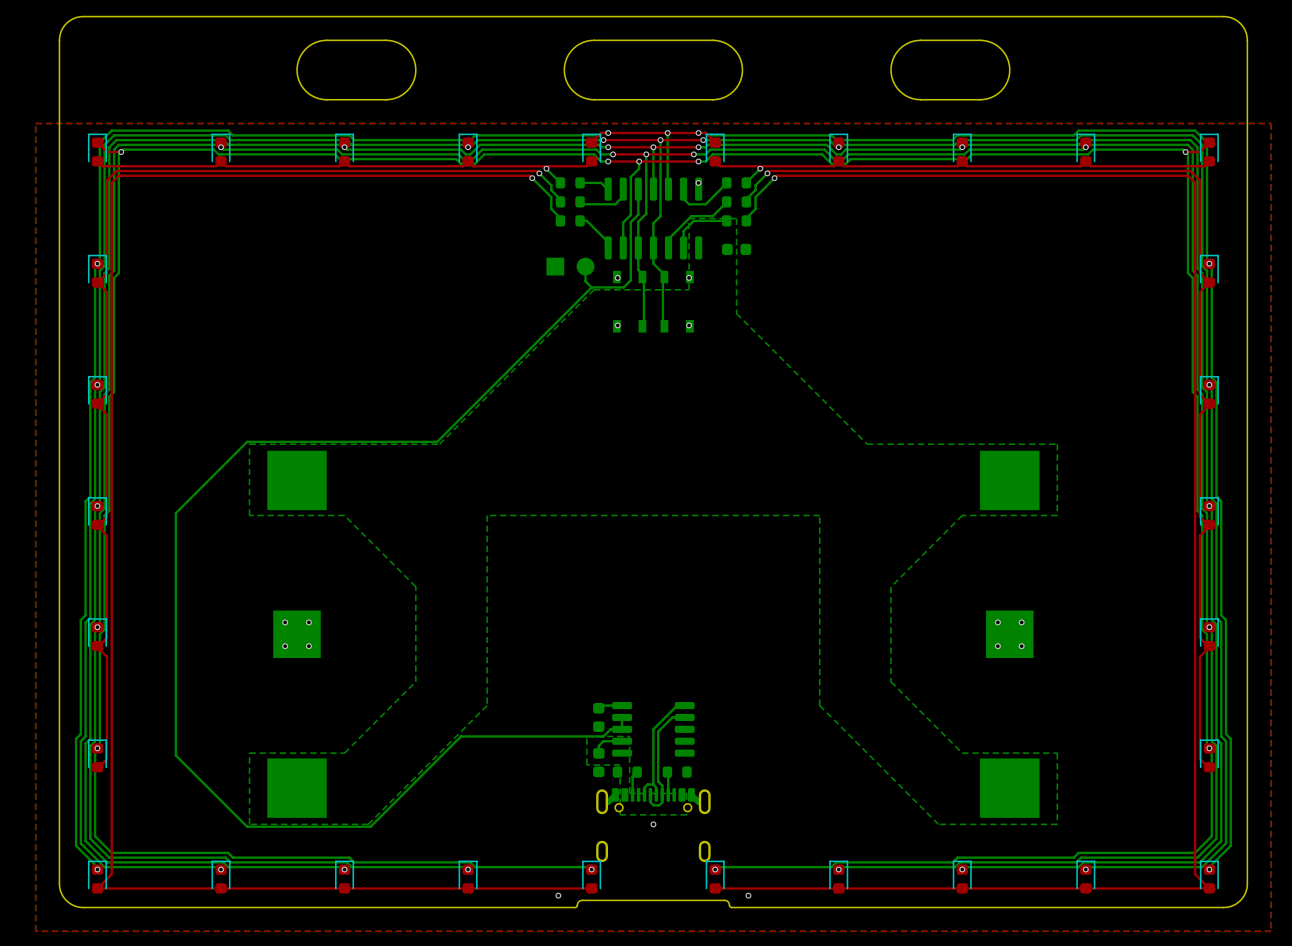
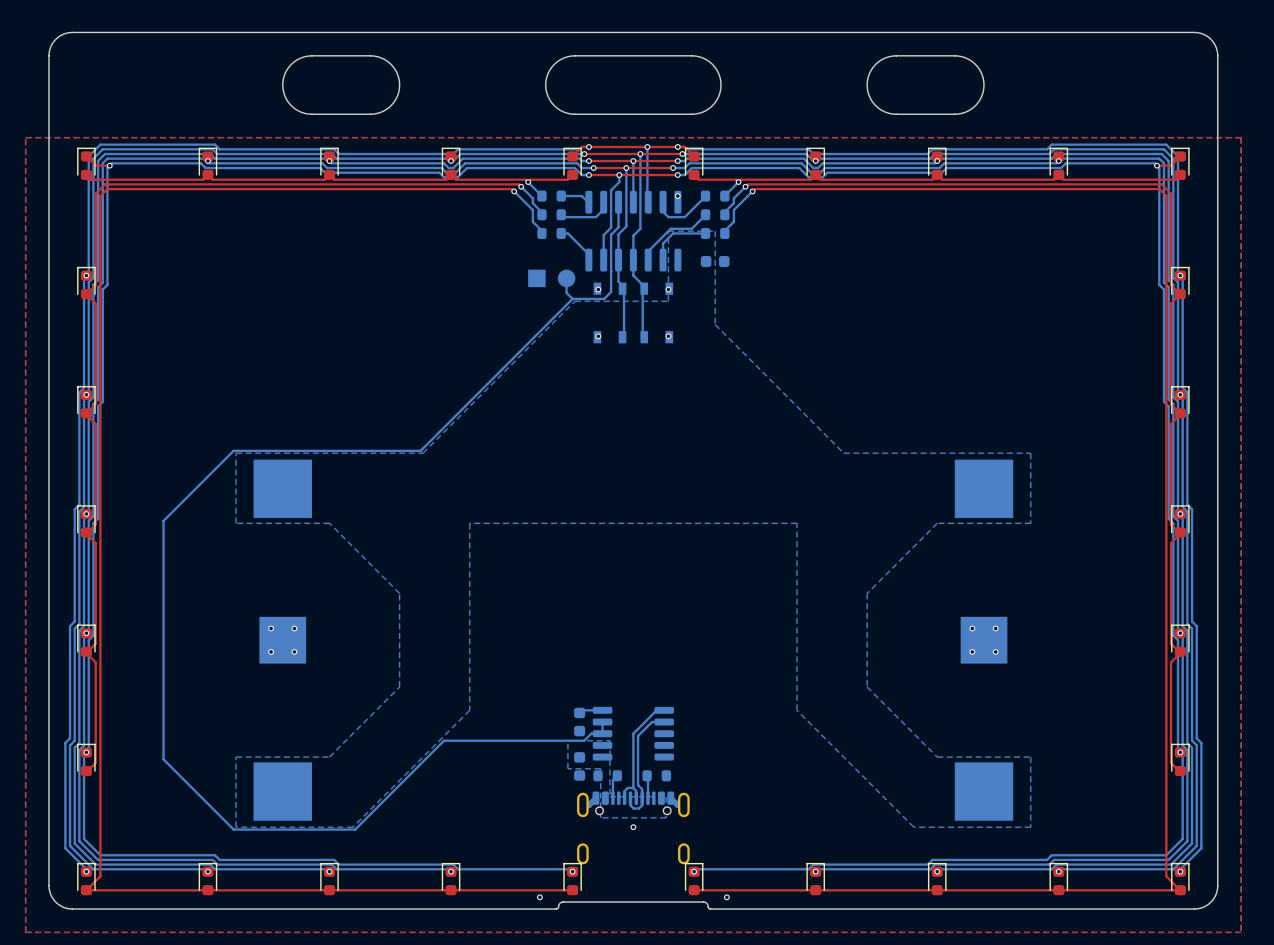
bottom track: (622, 741) (603, 741) (598, 745) (598, 753) -> none

